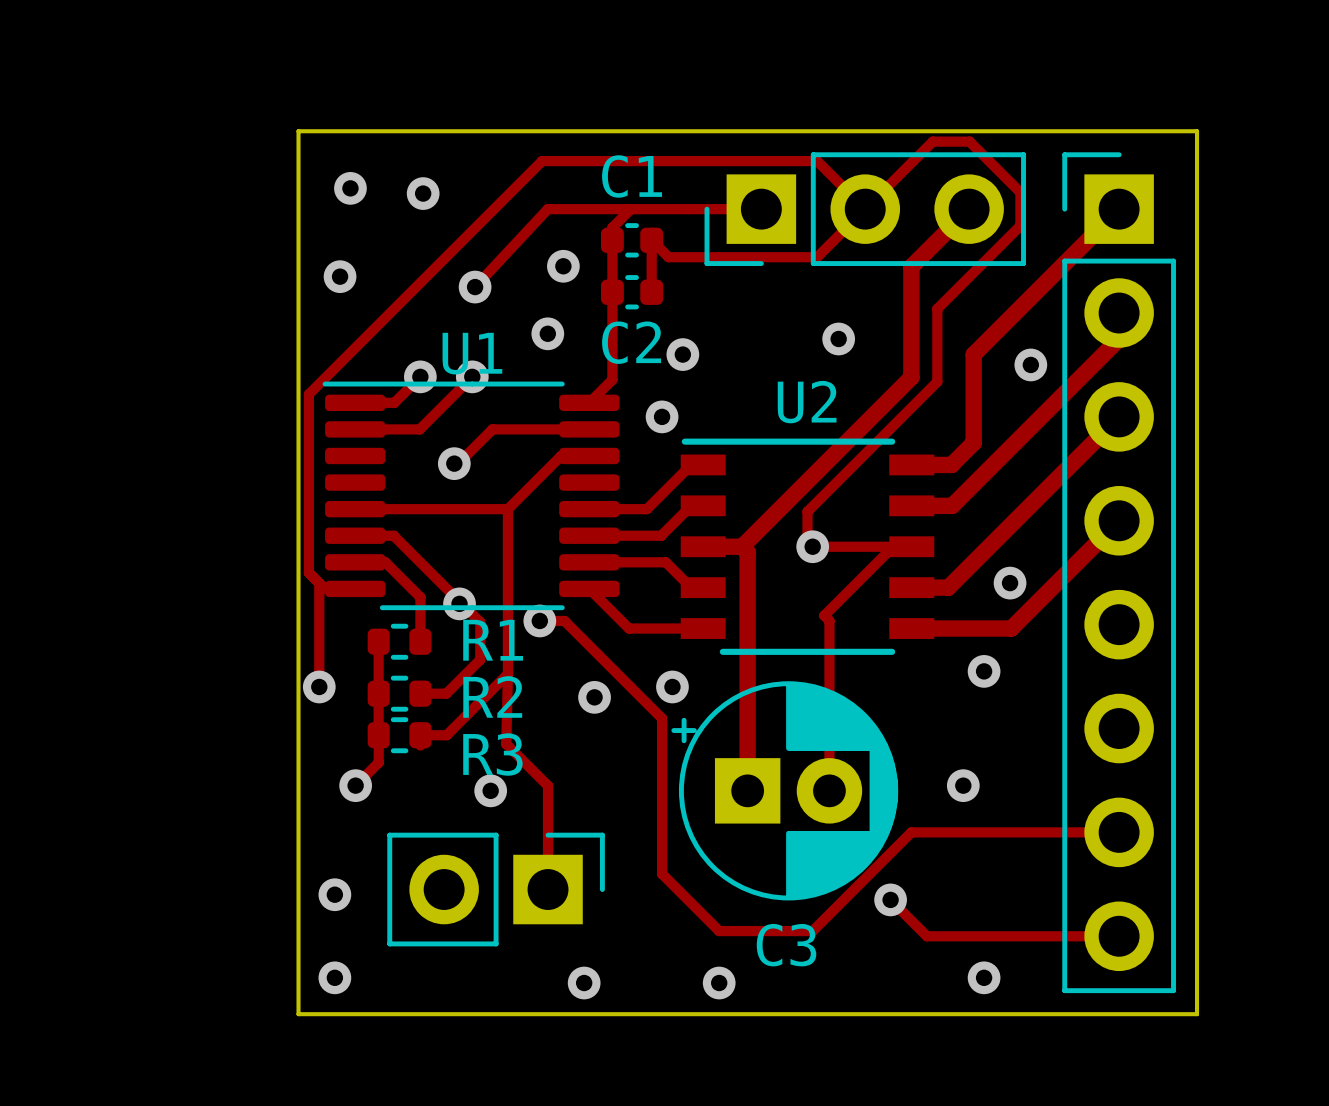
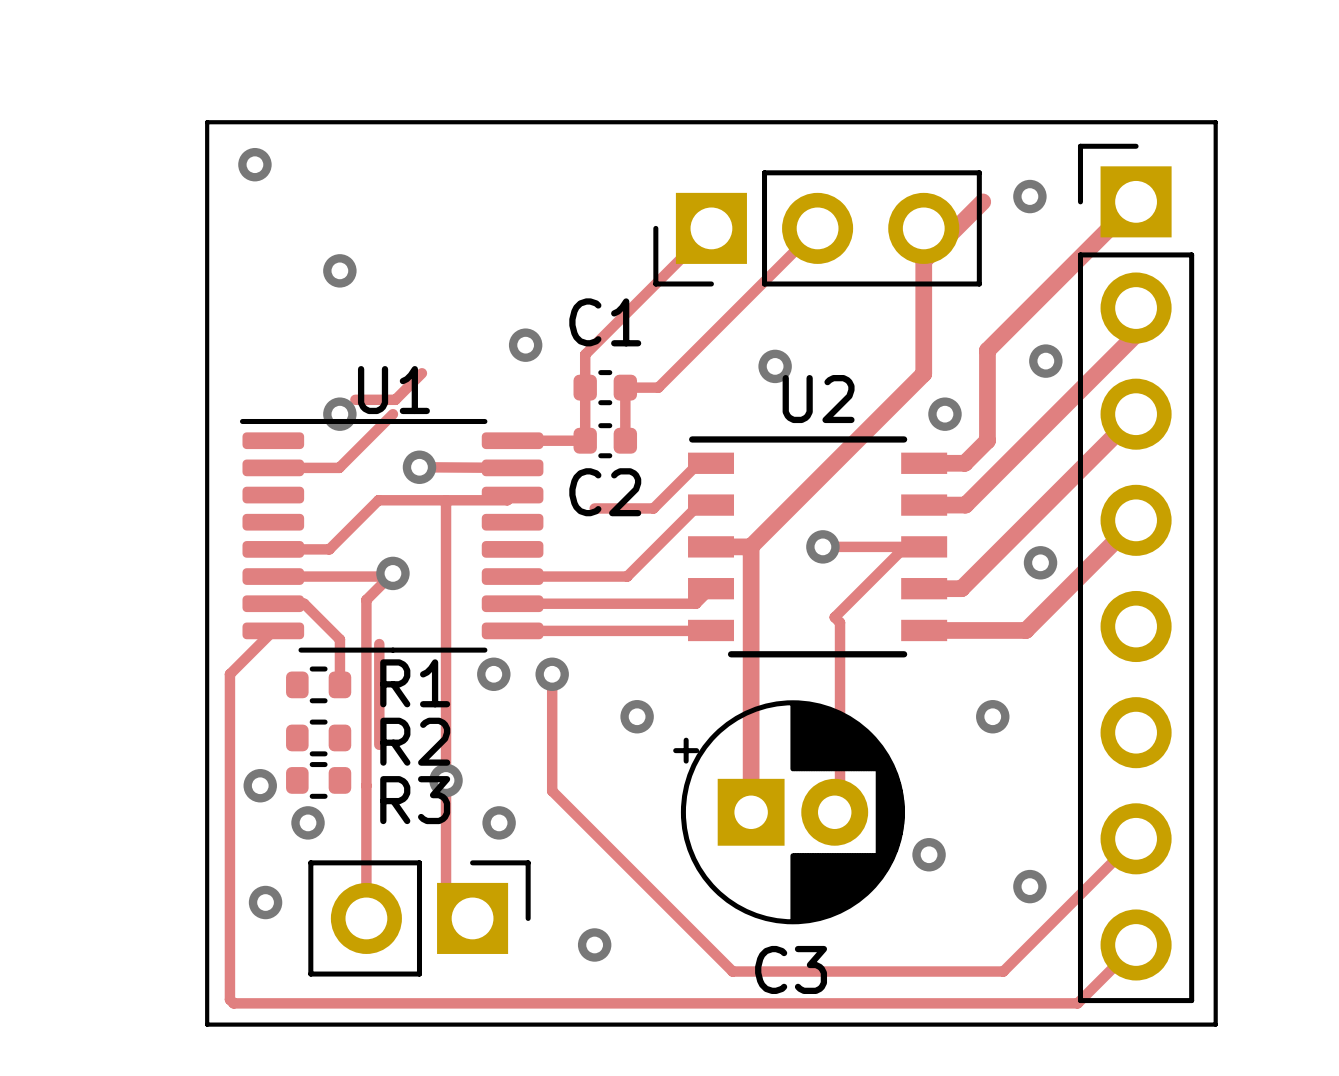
board edge: (298, 131) (298, 1014) -> (297, 122) (207, 122) (207, 1024) (297, 1024)
via: none -> (254, 164)
via: (350, 188) -> none
via: (423, 193) -> none
via: none -> (1029, 196)
track: (630, 209) (612, 227) (612, 379) (589, 402) -> none
track: (865, 209) (817, 161) (542, 161) (308, 394) (308, 572) (325, 588) (355, 588) -> none
part position: (865, 209) -> (817, 228)
track: (761, 230) (761, 209) (547, 209) (475, 287) (475, 281) -> none
track: none -> (711, 228) (585, 354) (585, 440) (512, 440)
track: none -> (817, 228) (658, 387) (625, 387) (625, 440)
C1 position: (632, 240) -> (605, 387)
via: (563, 266) -> none
via: (475, 287) -> none
C2 position: (632, 292) -> (605, 440)
track: (651, 292) (651, 240) (668, 257) (817, 257) (932, 141) (969, 141) (1020, 192) (1020, 225) (937, 308) (937, 381) (807, 511) (807, 546) -> none
via position: (547, 333) -> (525, 345)
via: (838, 338) -> none
via: (682, 354) -> none
via: none -> (775, 366)
via: (420, 376) -> none
track: (472, 376) (419, 429) (355, 429) -> (392, 414) (339, 467) (273, 467)
via: (472, 376) -> none
via: none -> (339, 414)
via: (662, 416) -> none
via: none -> (944, 414)
track: (589, 429) (492, 429) (458, 463) (454, 463) (454, 467) (456, 465) -> none
track: (589, 455) (561, 455) (507, 509) -> none
via position: (454, 463) -> (419, 467)
track: none -> (419, 467) (512, 467)
U1 position: (471, 495) -> (391, 535)
track: none -> (512, 495) (507, 500) (378, 500) (329, 549) (273, 549)
track: none -> (446, 500) (446, 891) (472, 918)
track: (355, 509) (507, 509) -> none
track: (507, 509) (507, 674) -> none
track: (355, 535) (393, 535) (459, 601) (459, 603) (461, 603) (480, 622) (480, 659) (446, 693) (420, 693) -> none
track: (589, 535) (661, 535) -> (512, 576) (627, 576) (668, 535)
track: (742, 547) (747, 552) (747, 790) -> (751, 547) (751, 812)
track: (355, 562) (385, 562) (420, 597) (420, 641) -> (273, 603) (304, 603) (339, 639) (339, 684)
track: (589, 562) (665, 562) (691, 587) (703, 587) -> (512, 603) (695, 603) (711, 588)
track: none -> (392, 573) (366, 599) (366, 918)
via: none -> (392, 573)
track: none -> (273, 576) (389, 576)
track: (319, 583) (319, 686) -> none
via position: (1010, 583) -> (1040, 562)
track: (589, 588) (628, 628) (703, 628) -> (512, 630) (710, 630)
via: (459, 603) -> none
track: (539, 620) (564, 620) (662, 718) (662, 873) (719, 931) (812, 931) (911, 832) (1119, 832) -> (552, 791) (732, 971) (1003, 971) (1136, 838)
via: (539, 620) -> none
R1 position: (399, 641) -> (318, 684)
via: none -> (493, 674)
via: none -> (552, 674)
via: (984, 671) -> none
track: (507, 674) (506, 744) (547, 785) -> (552, 674) (552, 791)
track: (507, 674) (446, 735) (420, 735) (420, 745) -> none
via: (319, 686) -> none
via: (672, 686) -> none
R2 position: (399, 693) -> (318, 737)
via: (594, 697) -> none
via: none -> (637, 716)
via: none -> (992, 716)
track: (378, 735) (378, 762) (355, 785) -> none
R3 position: (399, 735) -> (318, 780)
via: none -> (446, 780)
via: none -> (260, 785)
via: (355, 785) -> none
track: (548, 785) (548, 889) -> none
via: (963, 785) -> none
via position: (490, 790) -> (499, 822)
C3 position: (784, 790) -> (789, 812)
via: none -> (308, 822)
via: none -> (929, 854)
via: none -> (1029, 886)
part position: (496, 889) -> (419, 918)
via: none -> (265, 902)
via: (334, 894) -> none
track: (890, 899) (926, 936) (1119, 936) -> (273, 630) (229, 674) (229, 999) (233, 1003) (1077, 1003) (1136, 944)
via: (890, 899) -> none
via: (334, 977) -> none
via: (984, 977) -> none
via position: (584, 983) -> (594, 944)
via: (719, 983) -> none

